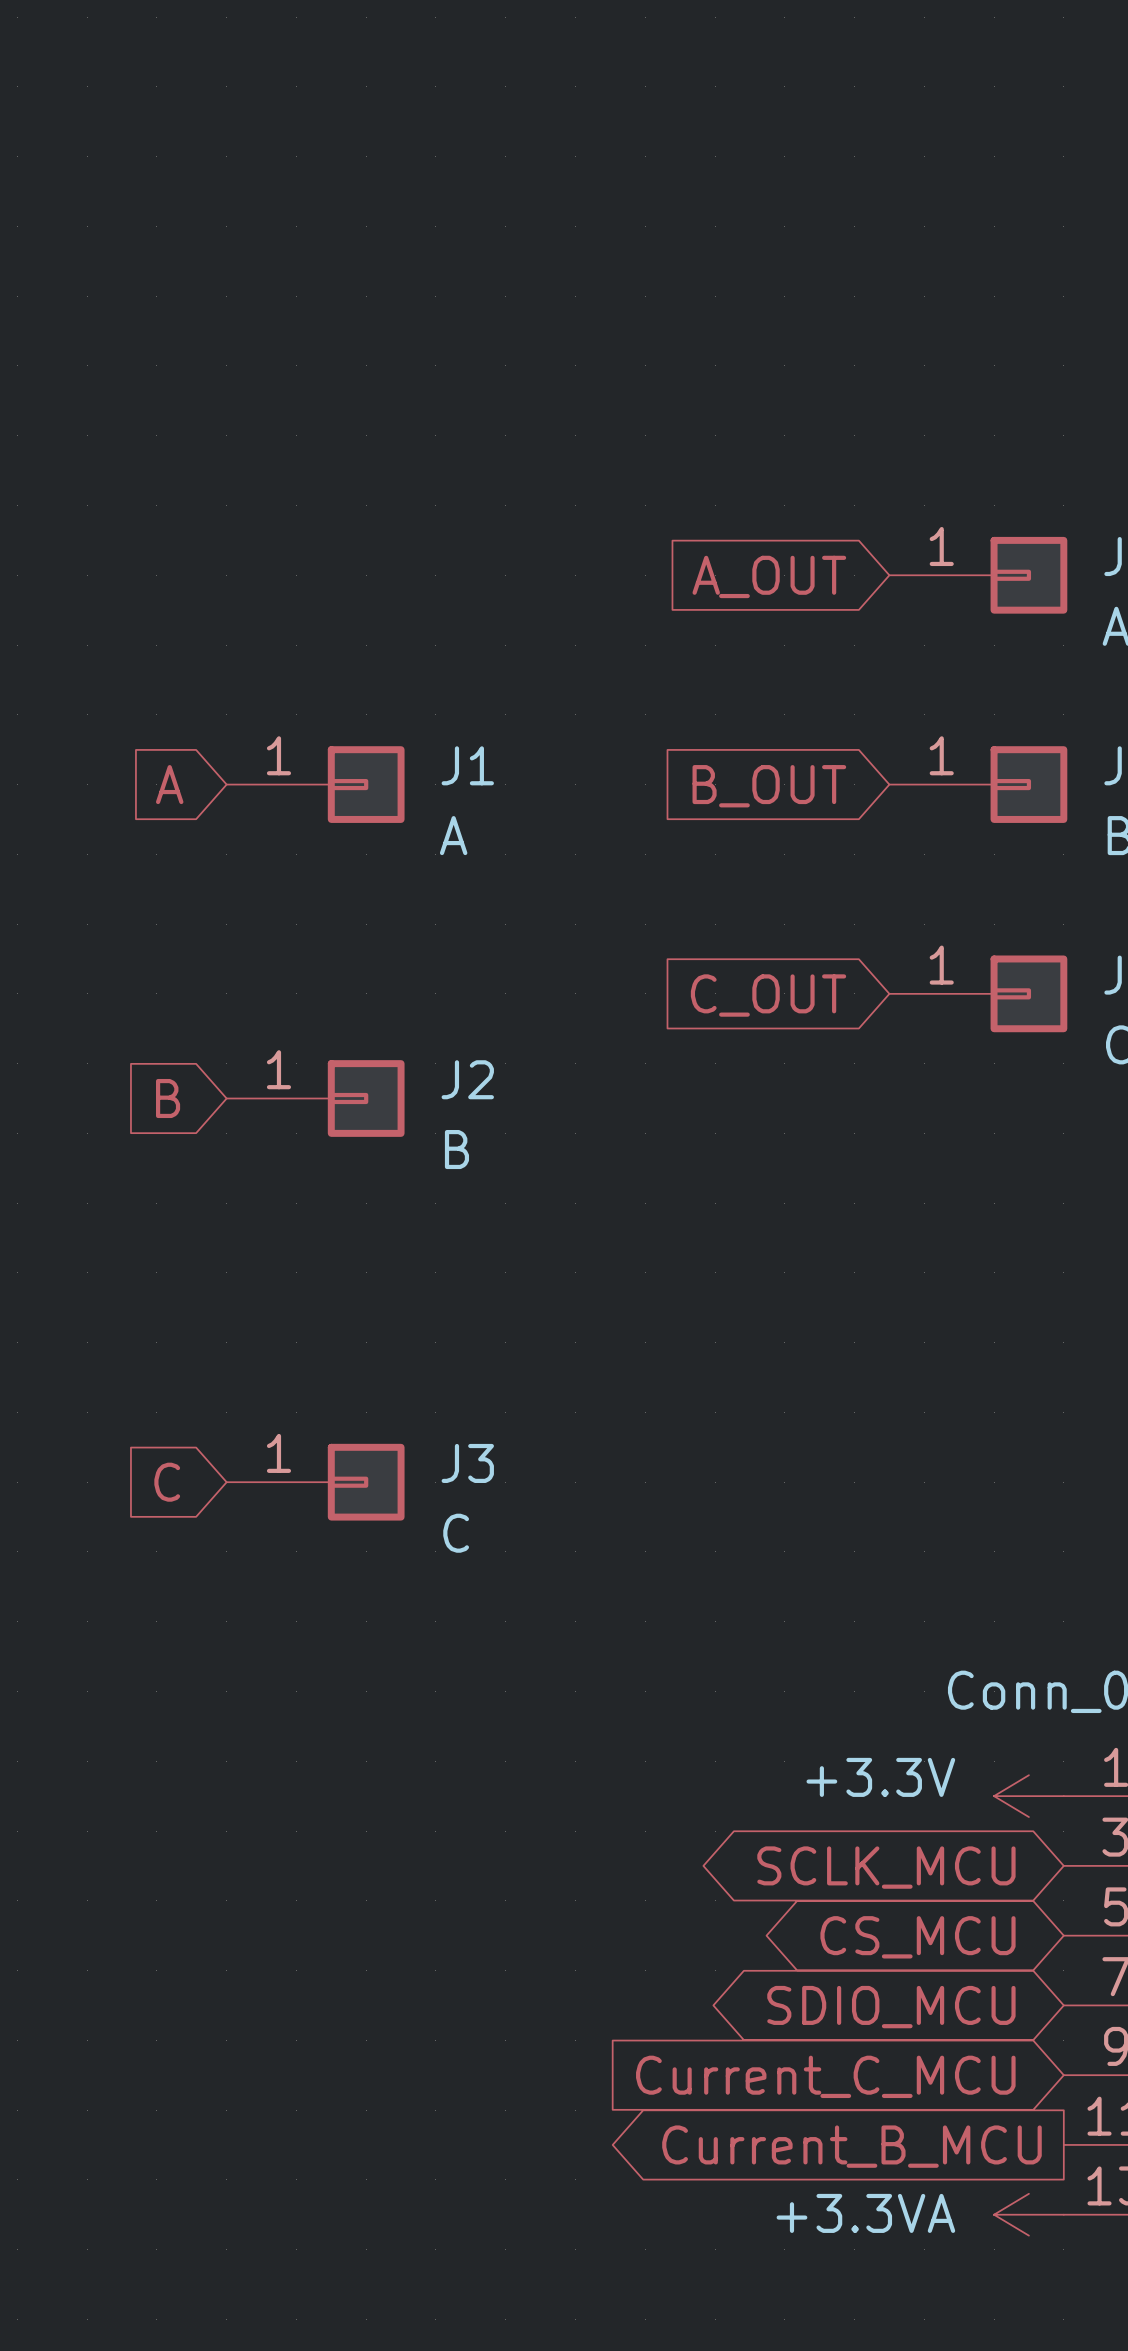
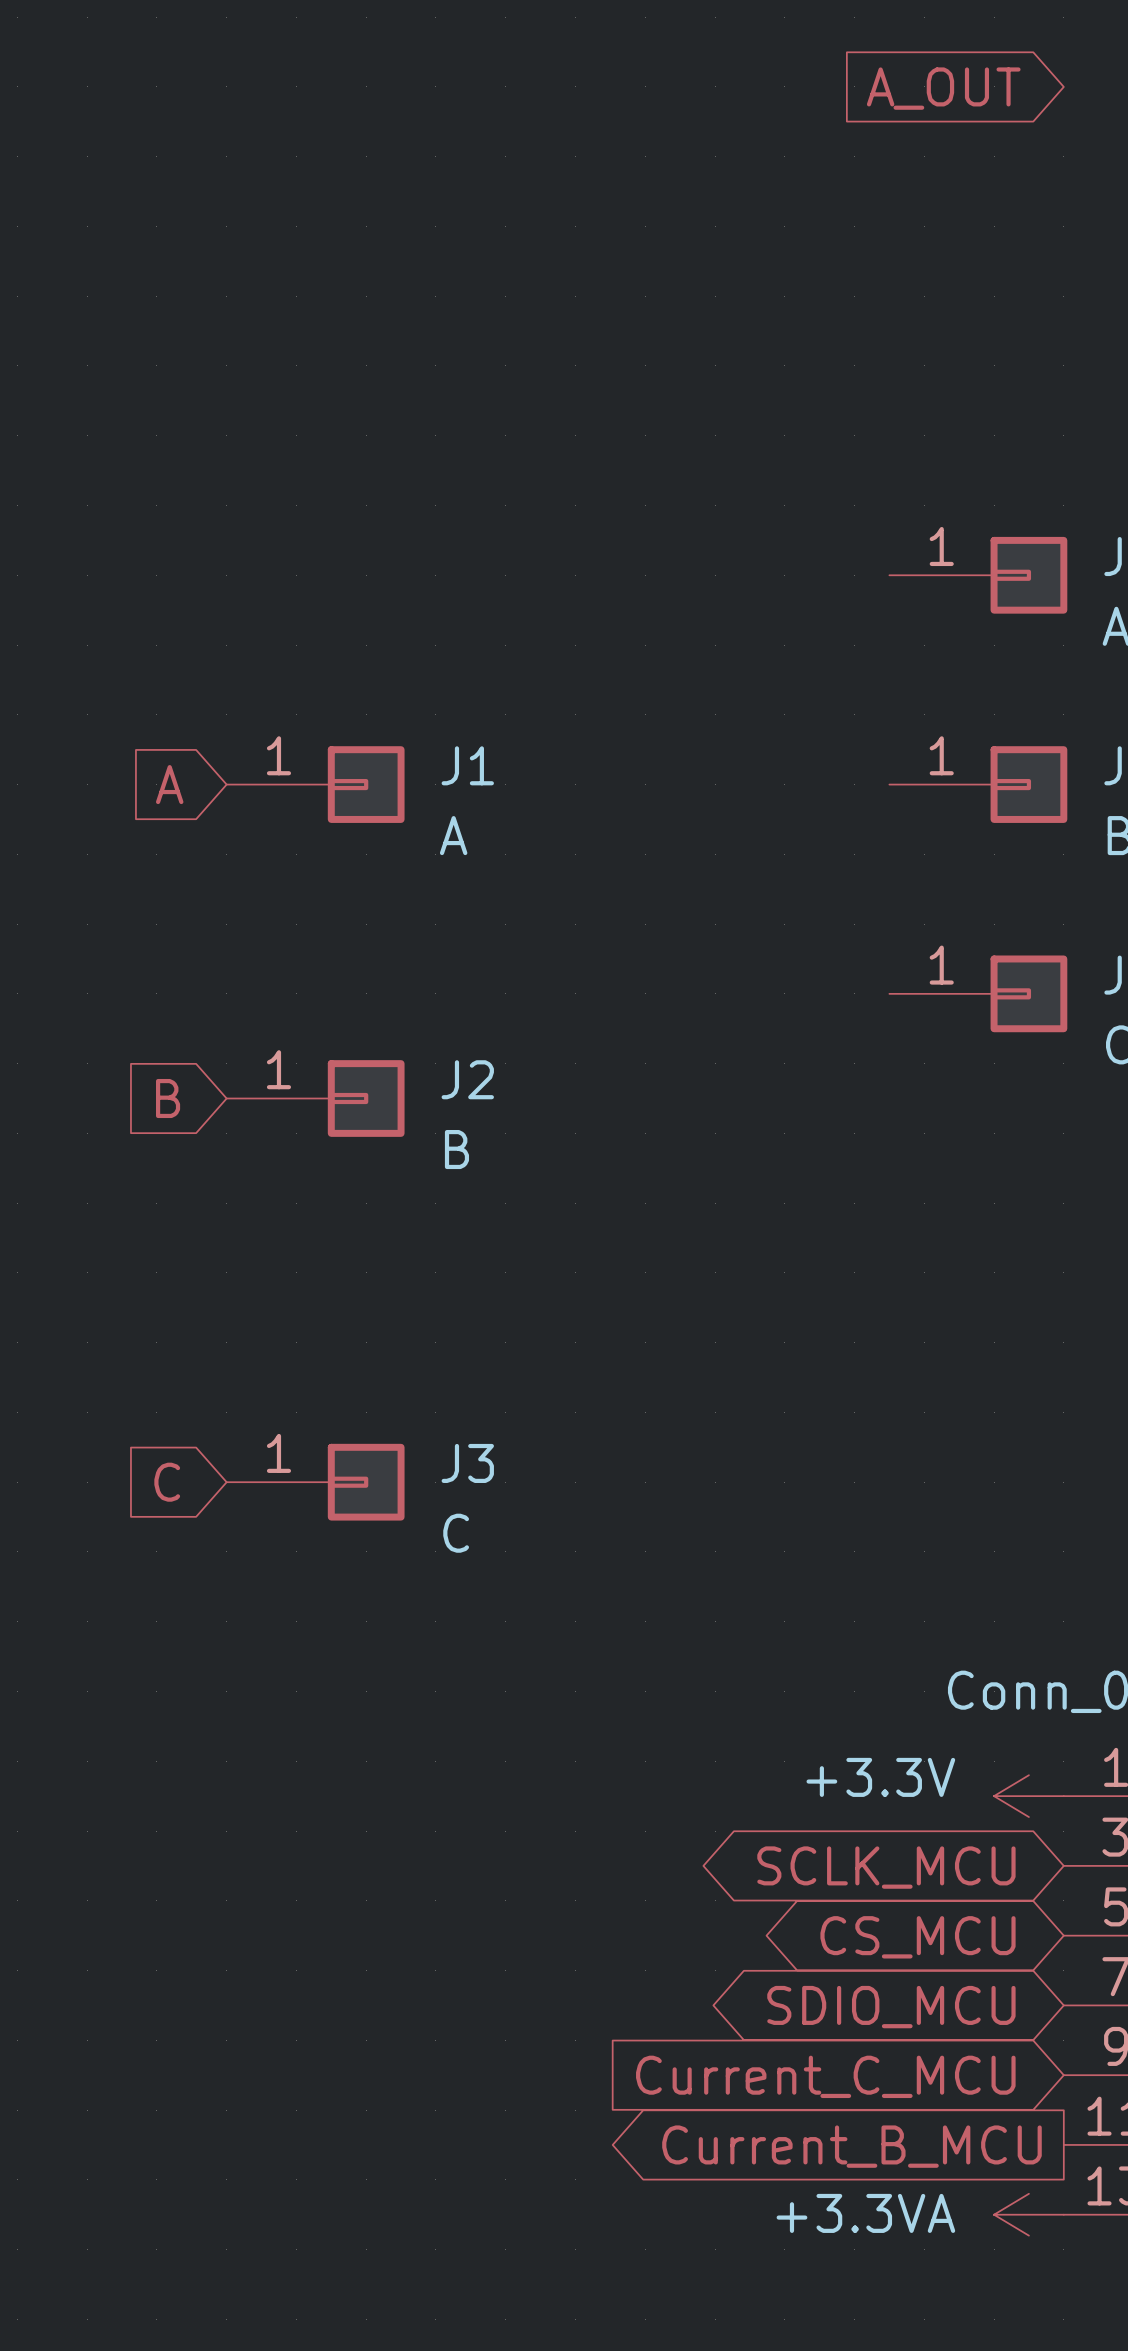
global label position: A_OUT (769, 576) -> A_OUT (943, 88)
global label: B_OUT (769, 786) -> none
global label: C_OUT (768, 995) -> none

